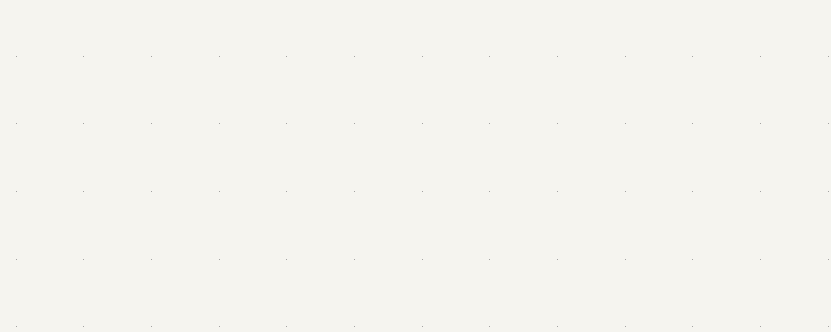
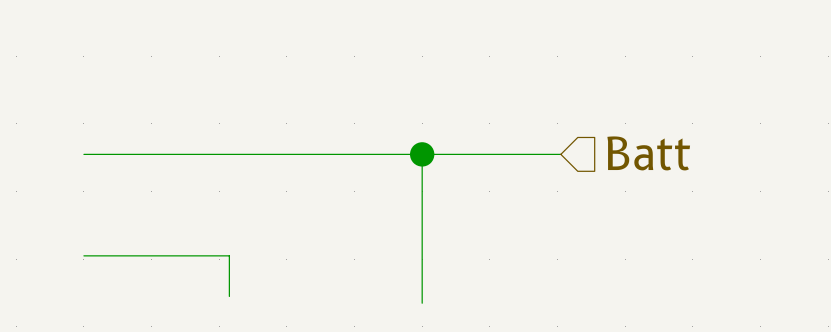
hierarchical label: none -> Batt (648, 153)
wire: none -> (83, 154) (560, 154)
wire: none -> (422, 154) (422, 303)
junction: none -> (422, 154)
wire: none -> (83, 255) (229, 255) (229, 296)

